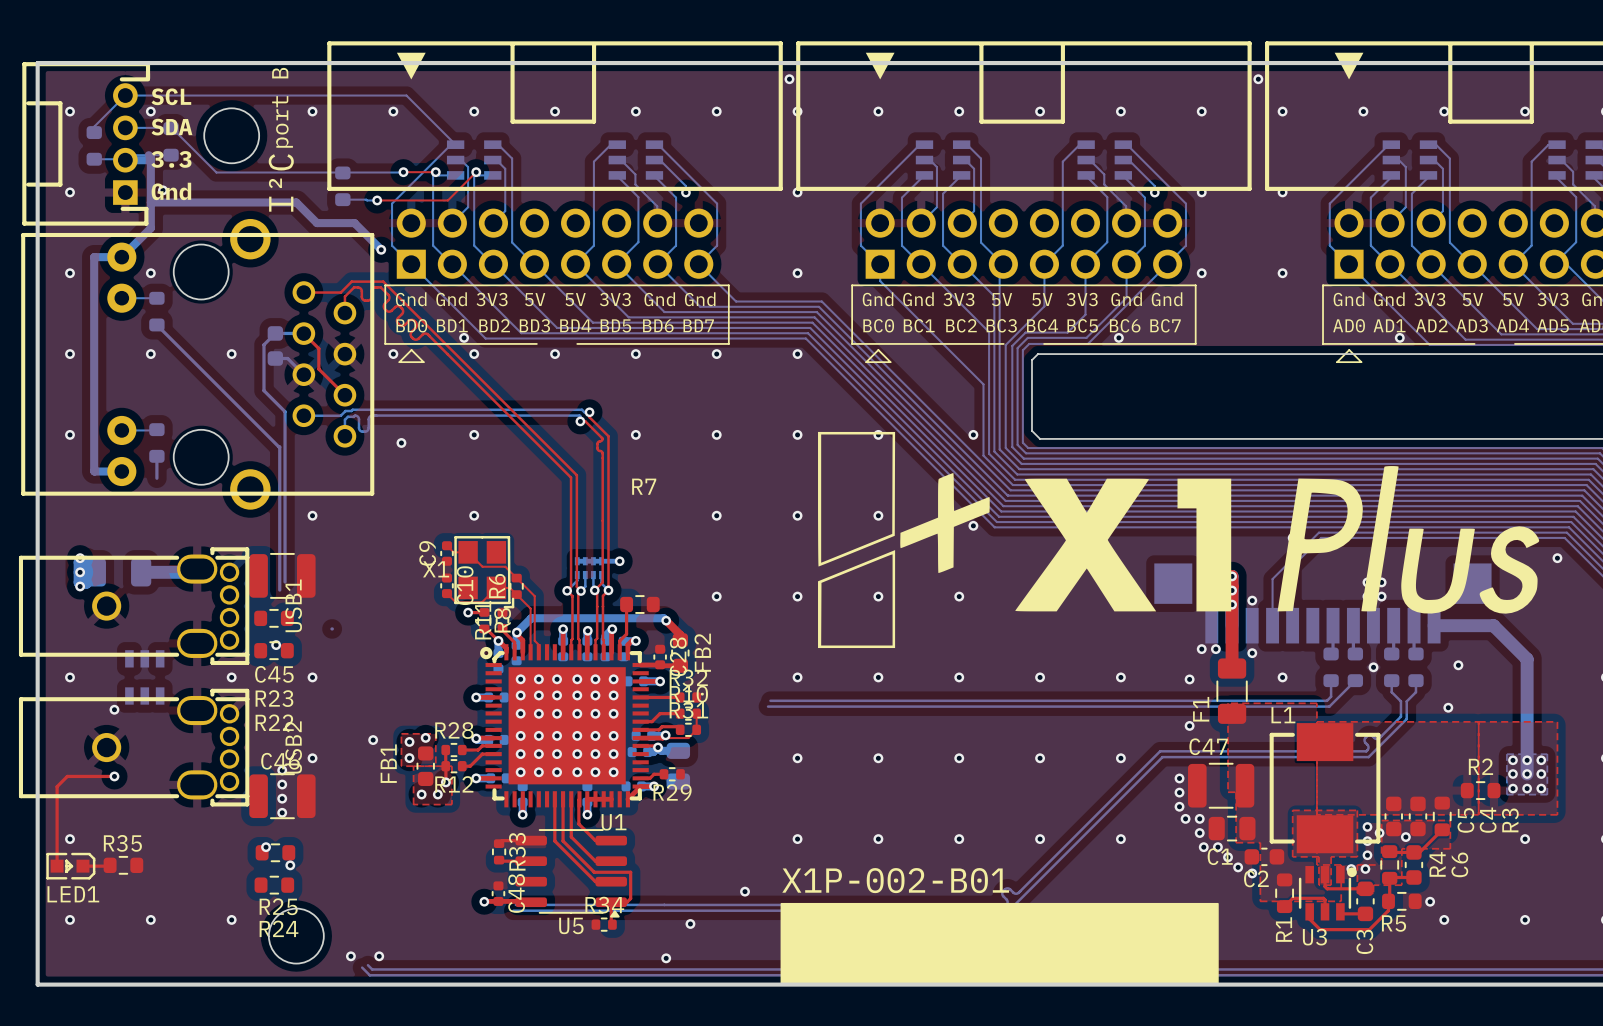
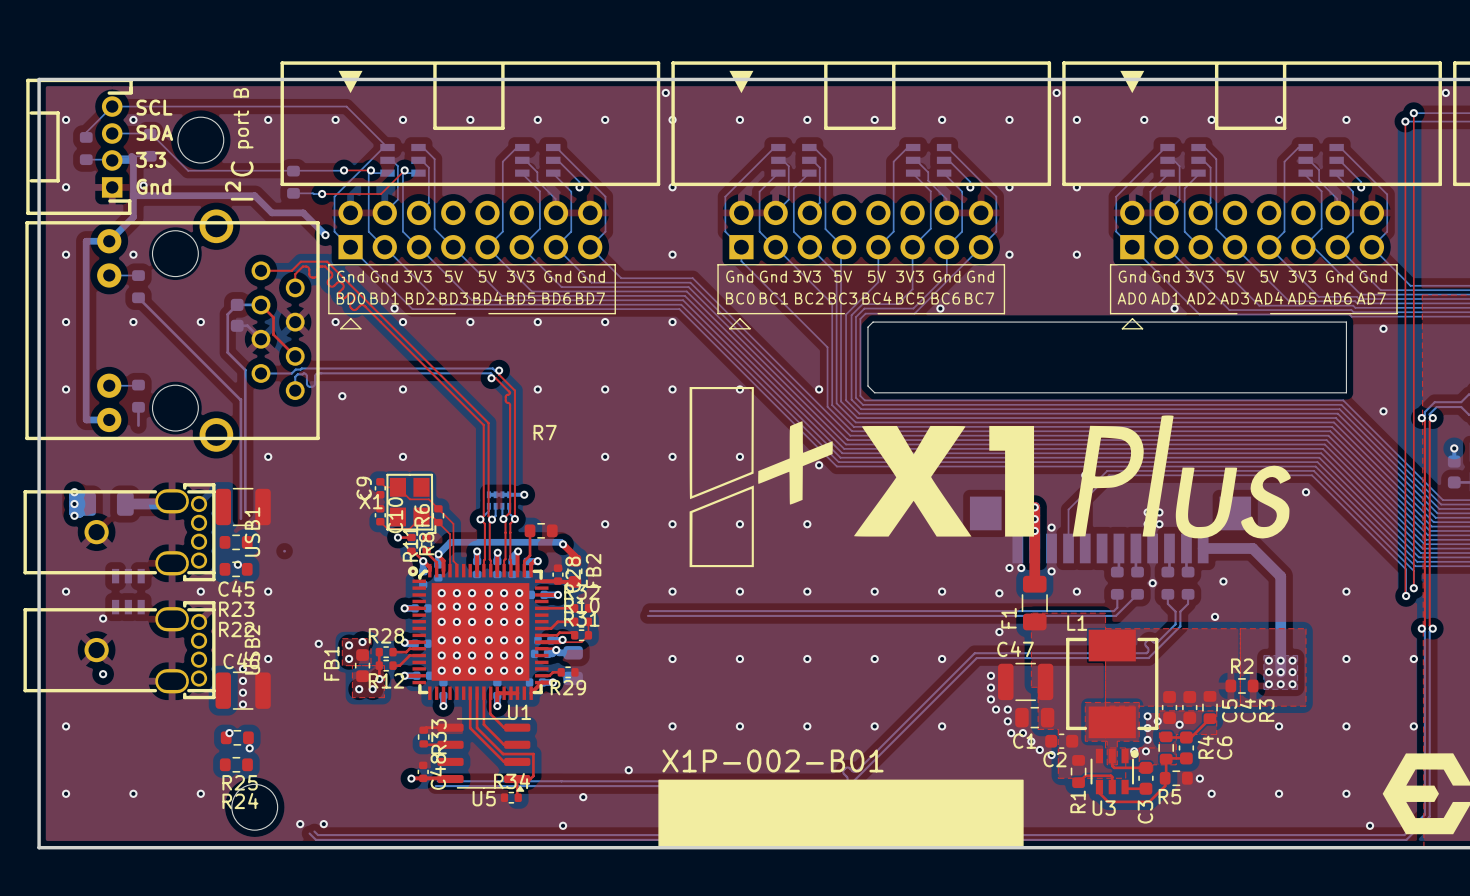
top track: (114, 776) (67, 776) (57, 786) (57, 866) -> none
top track: (110, 865) (82, 866) -> none
R35: (123, 865) -> none
LED1: (70, 866) -> none

